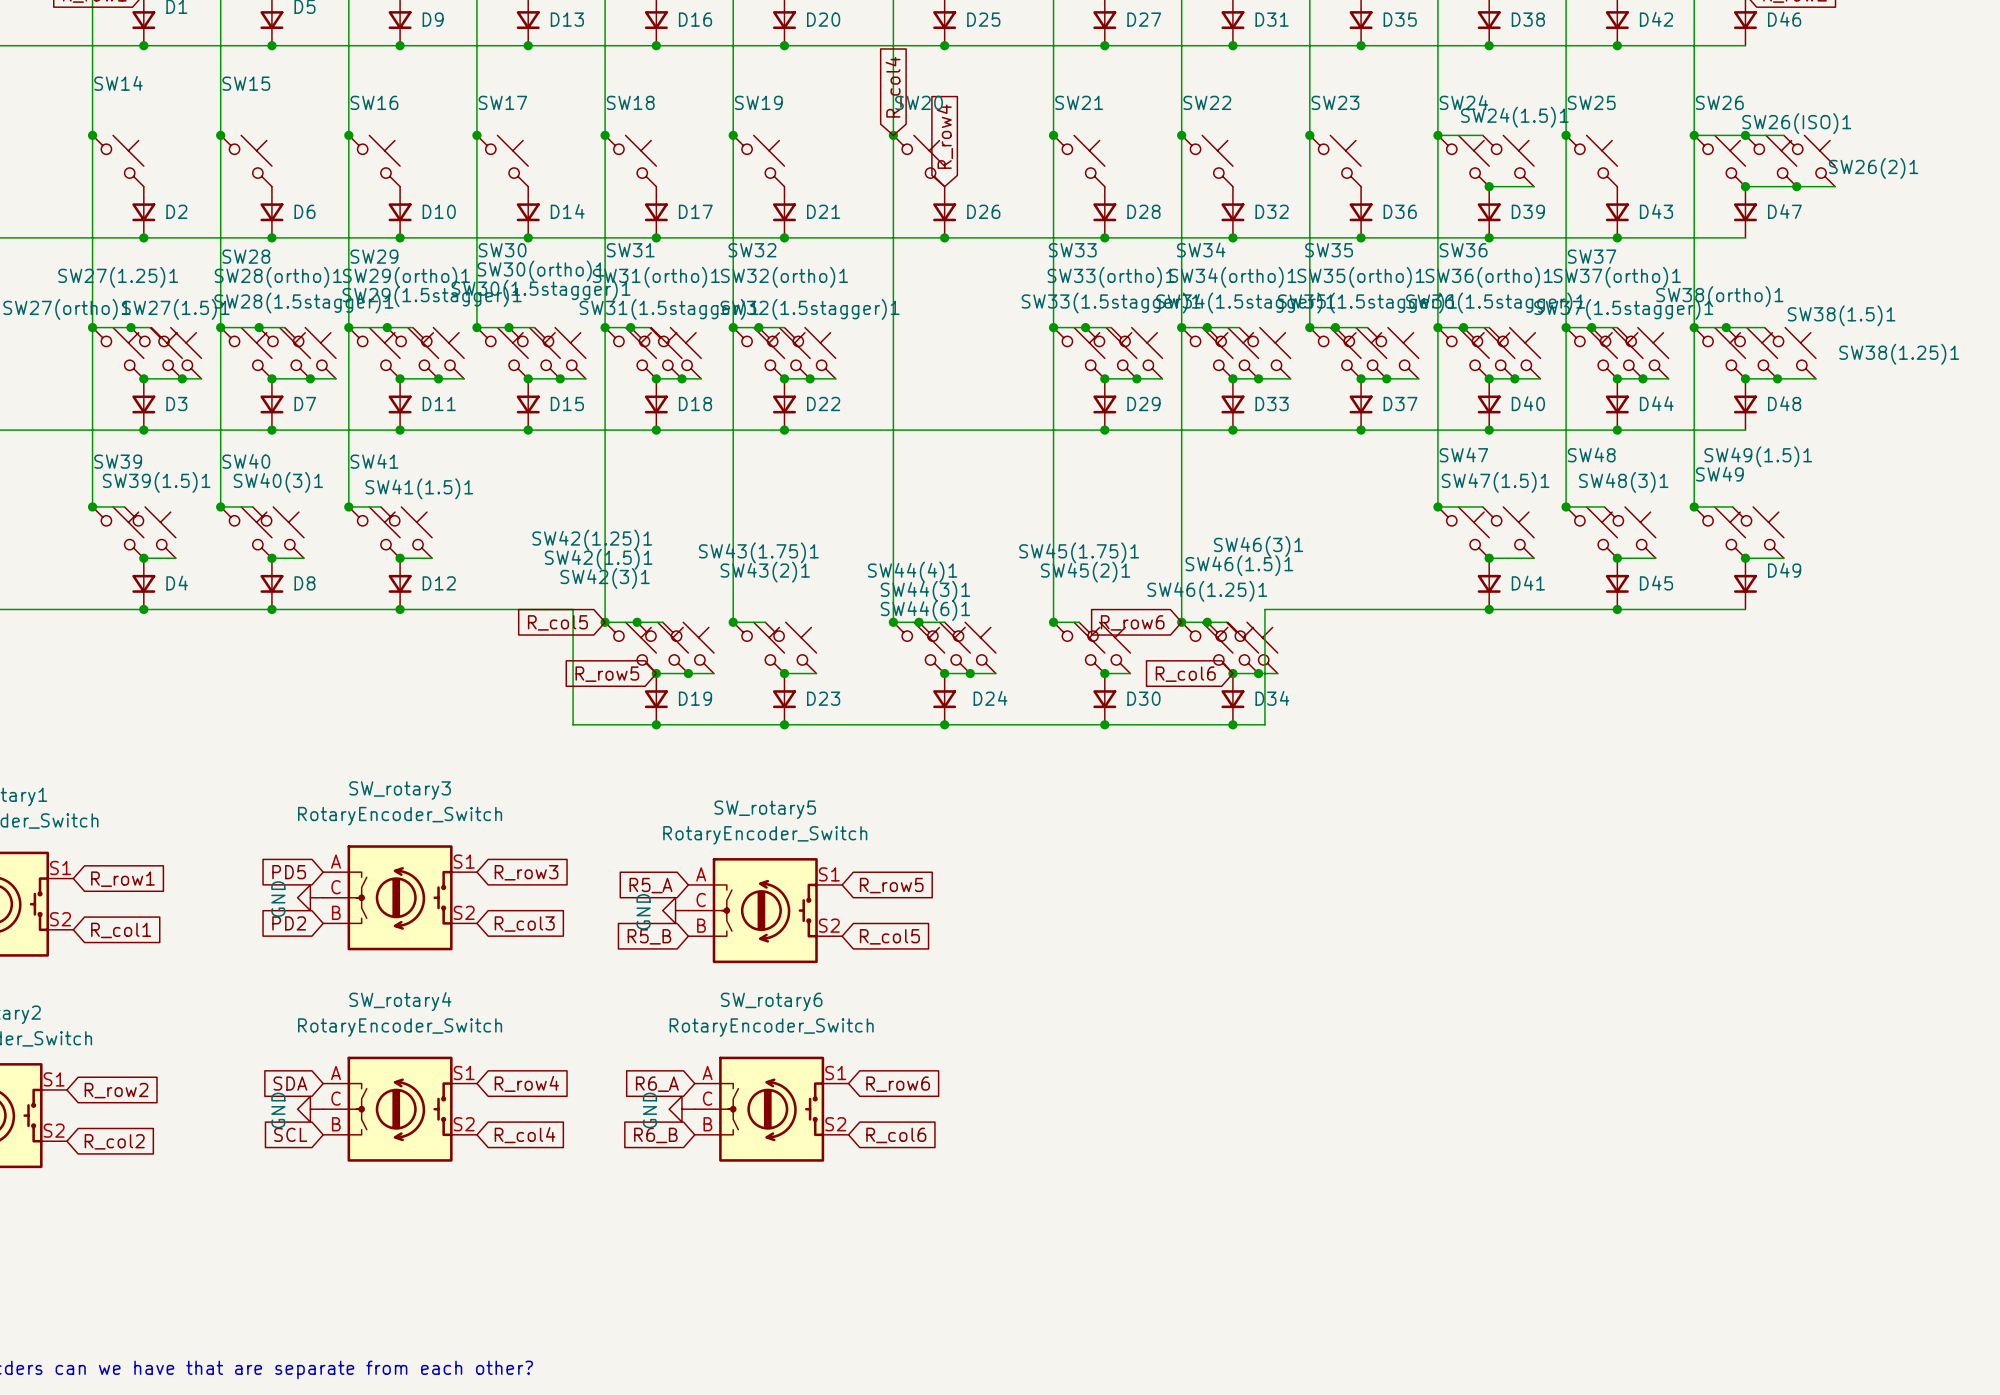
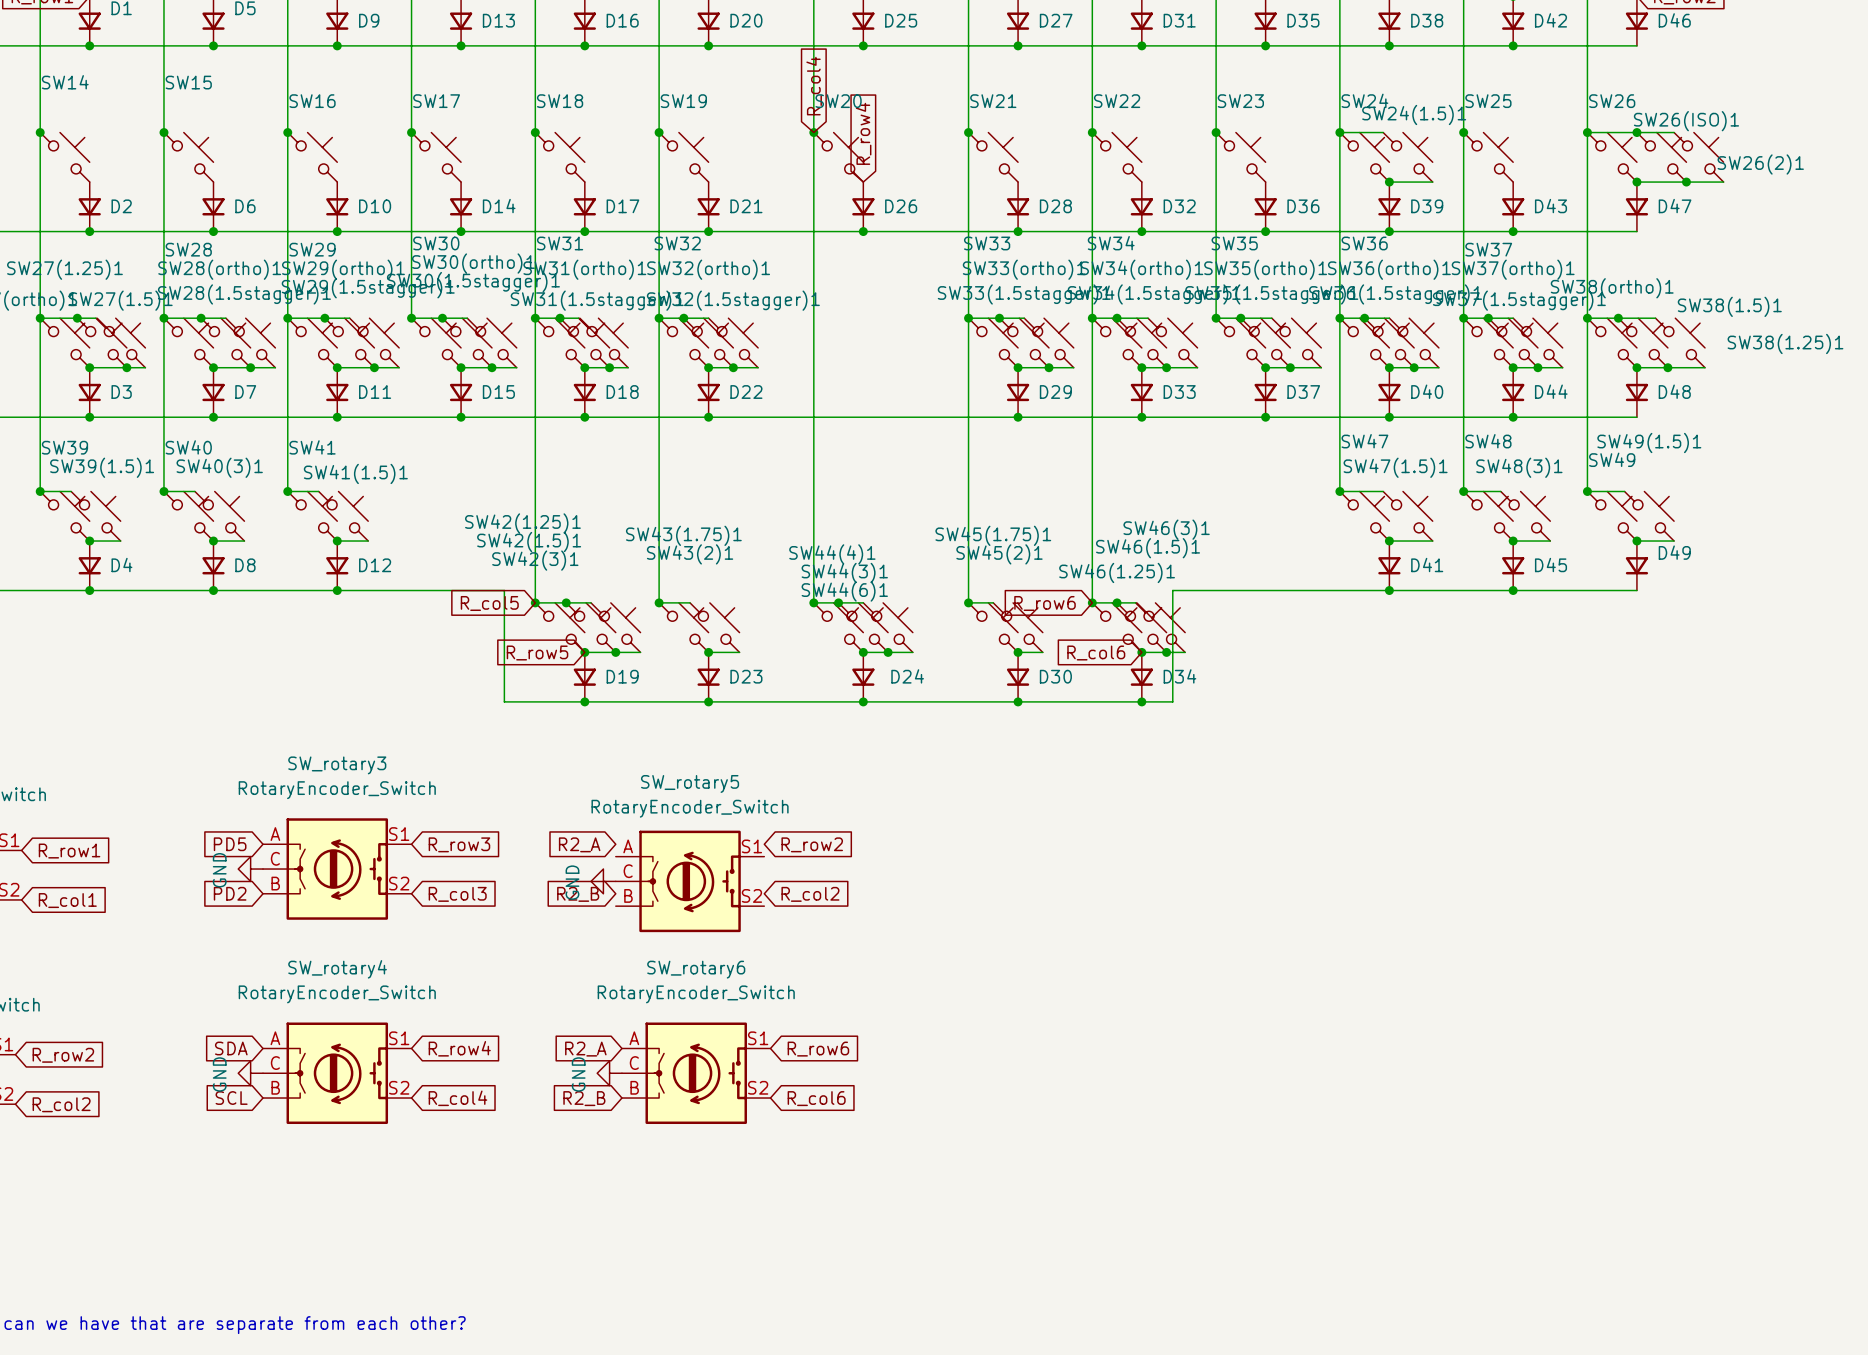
global label: R5_A (650, 885) -> R2_A (579, 844)
global label: R_row5 (891, 885) -> R_row2 (812, 844)
global label: R5_B (649, 936) -> R2_B (578, 894)
global label: R_col5 (889, 936) -> R_col2 (810, 894)
global label: R6_A (657, 1084) -> R2_A (585, 1049)
global label: R6_B (655, 1135) -> R2_B (584, 1098)

